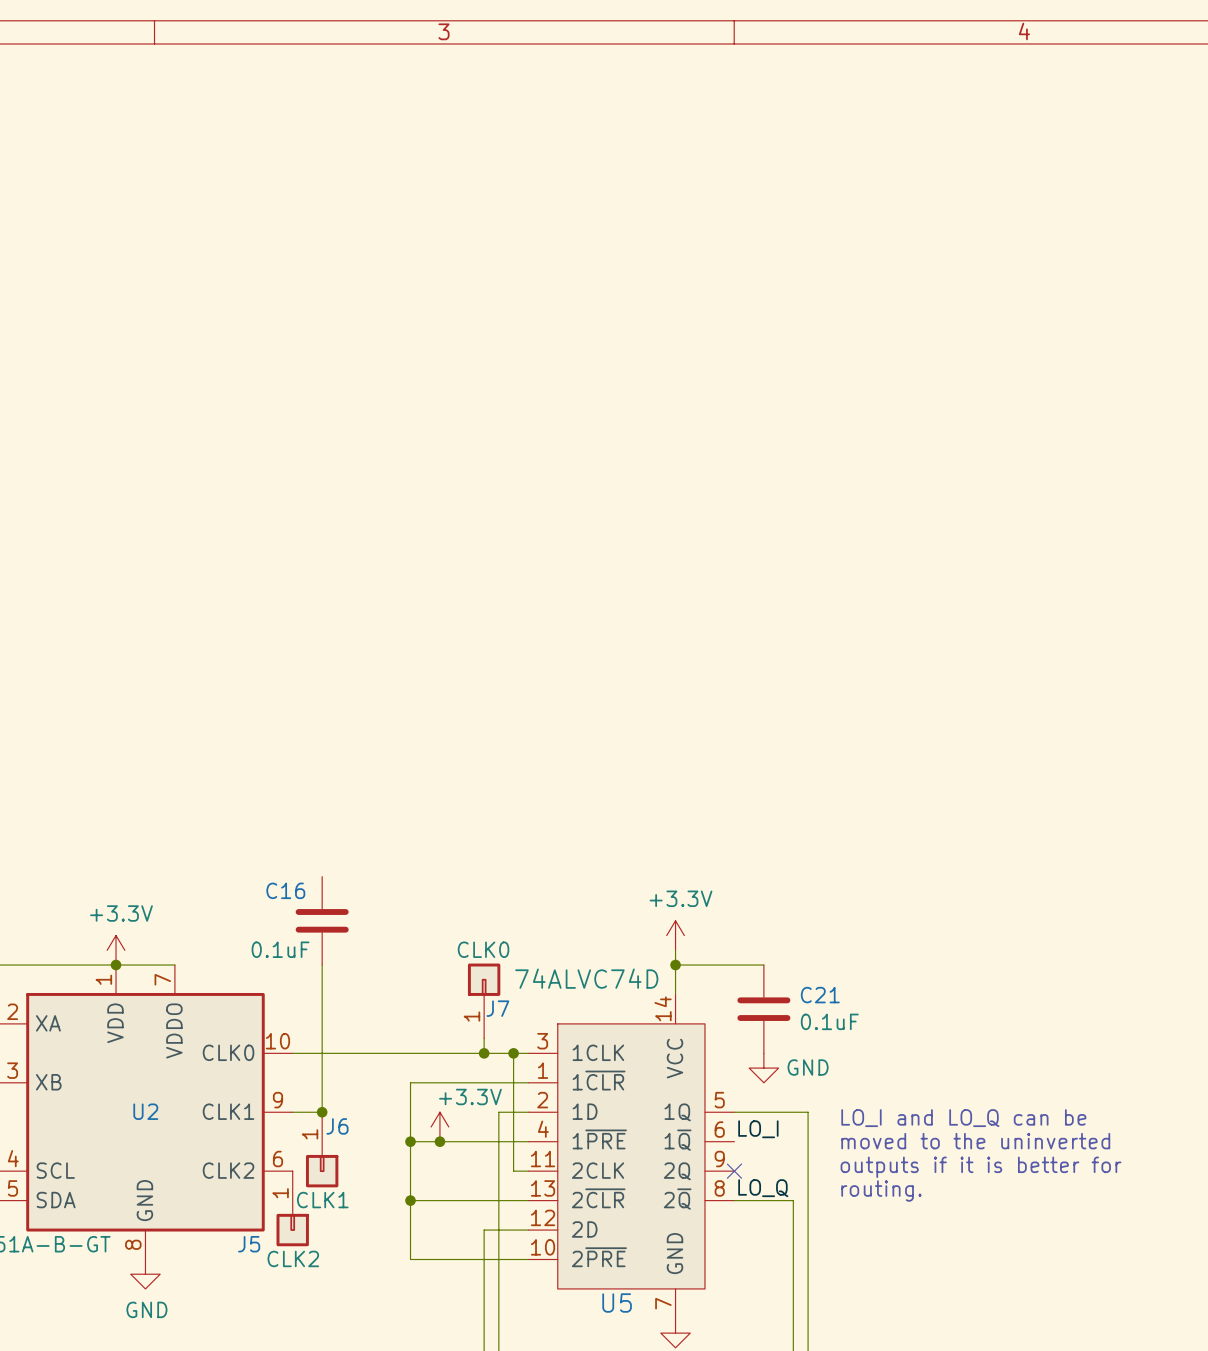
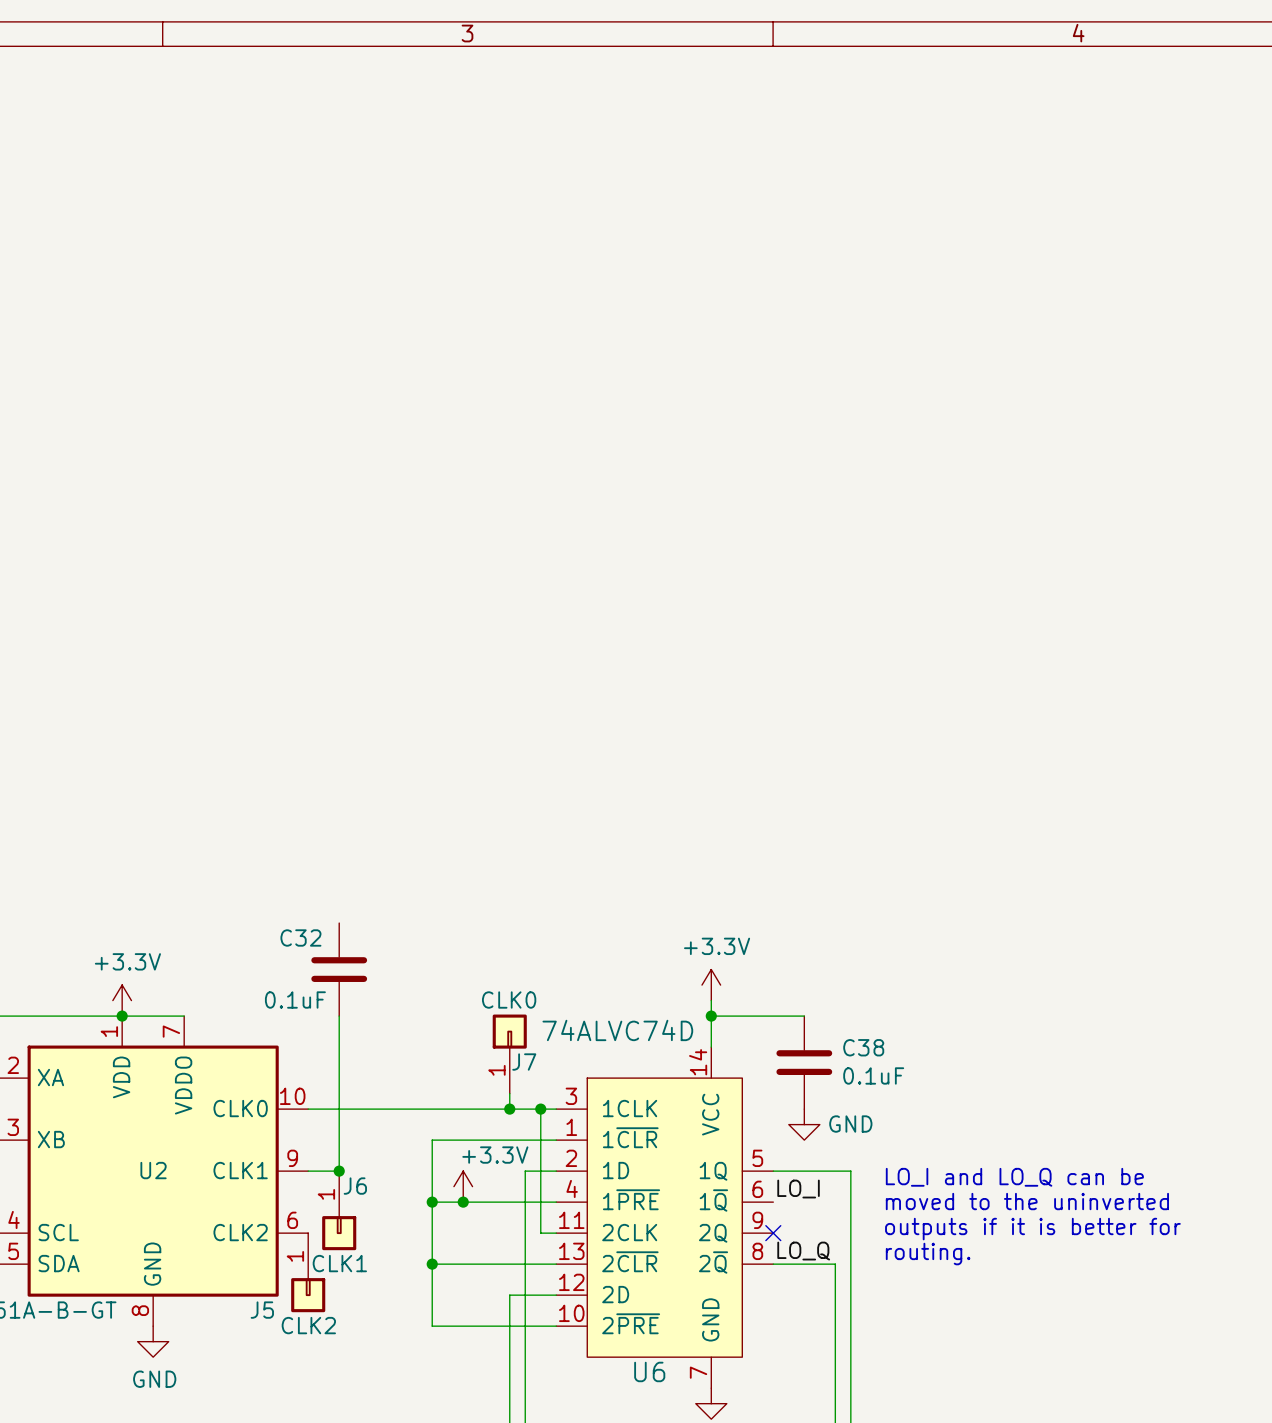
C16 name: C16 (285, 890) -> C32 (300, 937)
C21 name: C21 (820, 995) -> C38 (863, 1047)
U5 name: U5 (617, 1303) -> U6 (649, 1371)

